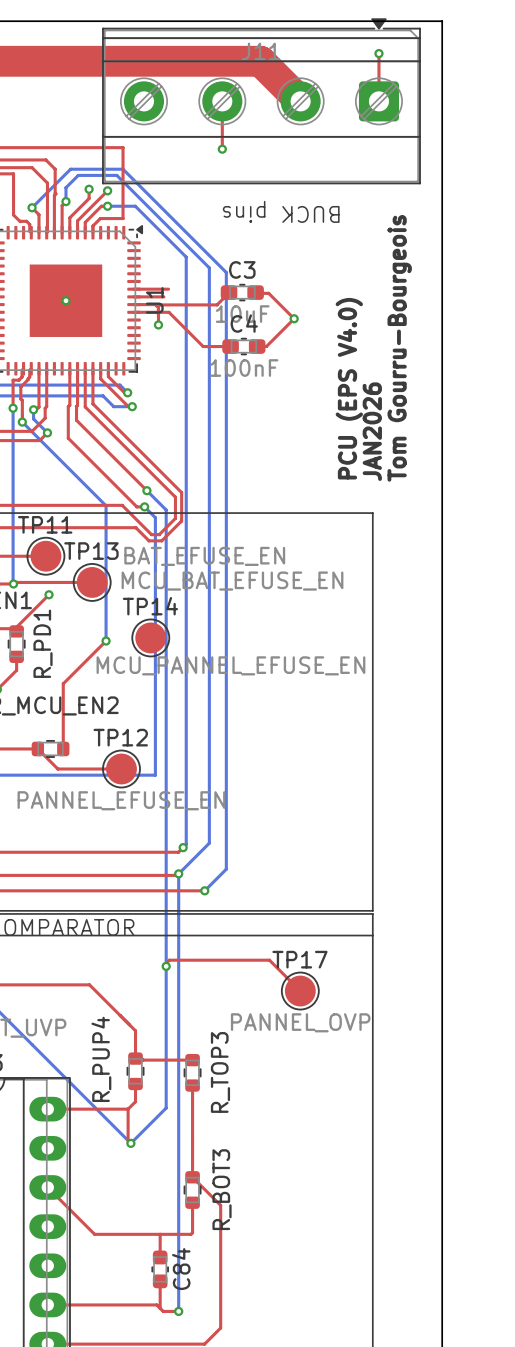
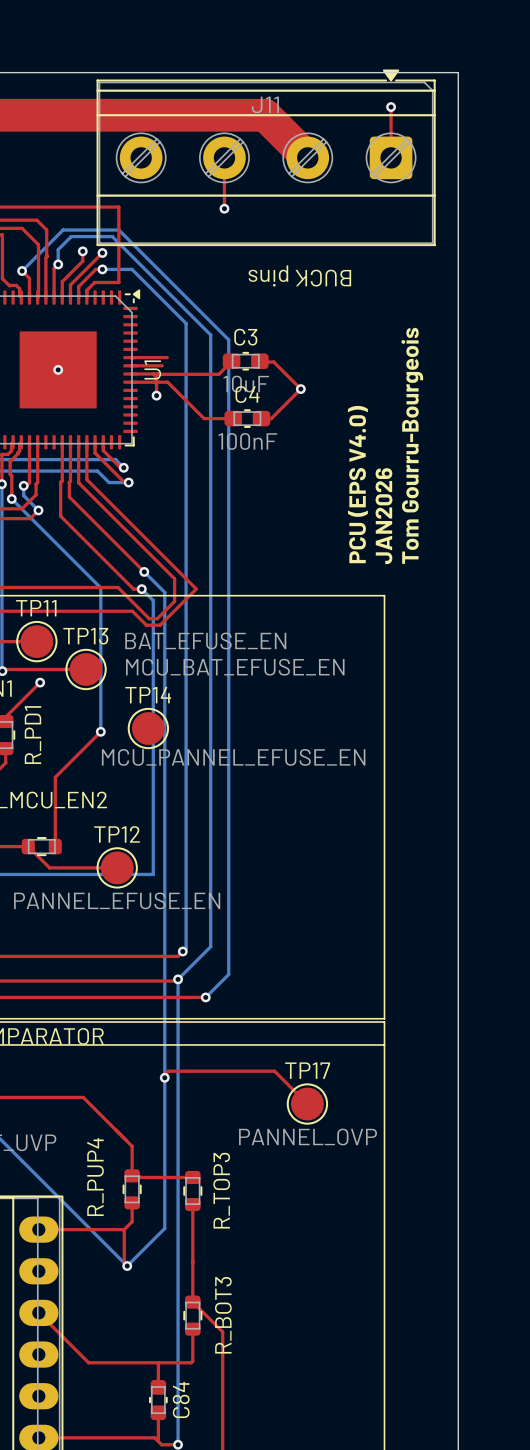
top track: (181, 492) (181, 521) -> (181, 573) (195, 588) (181, 604)

